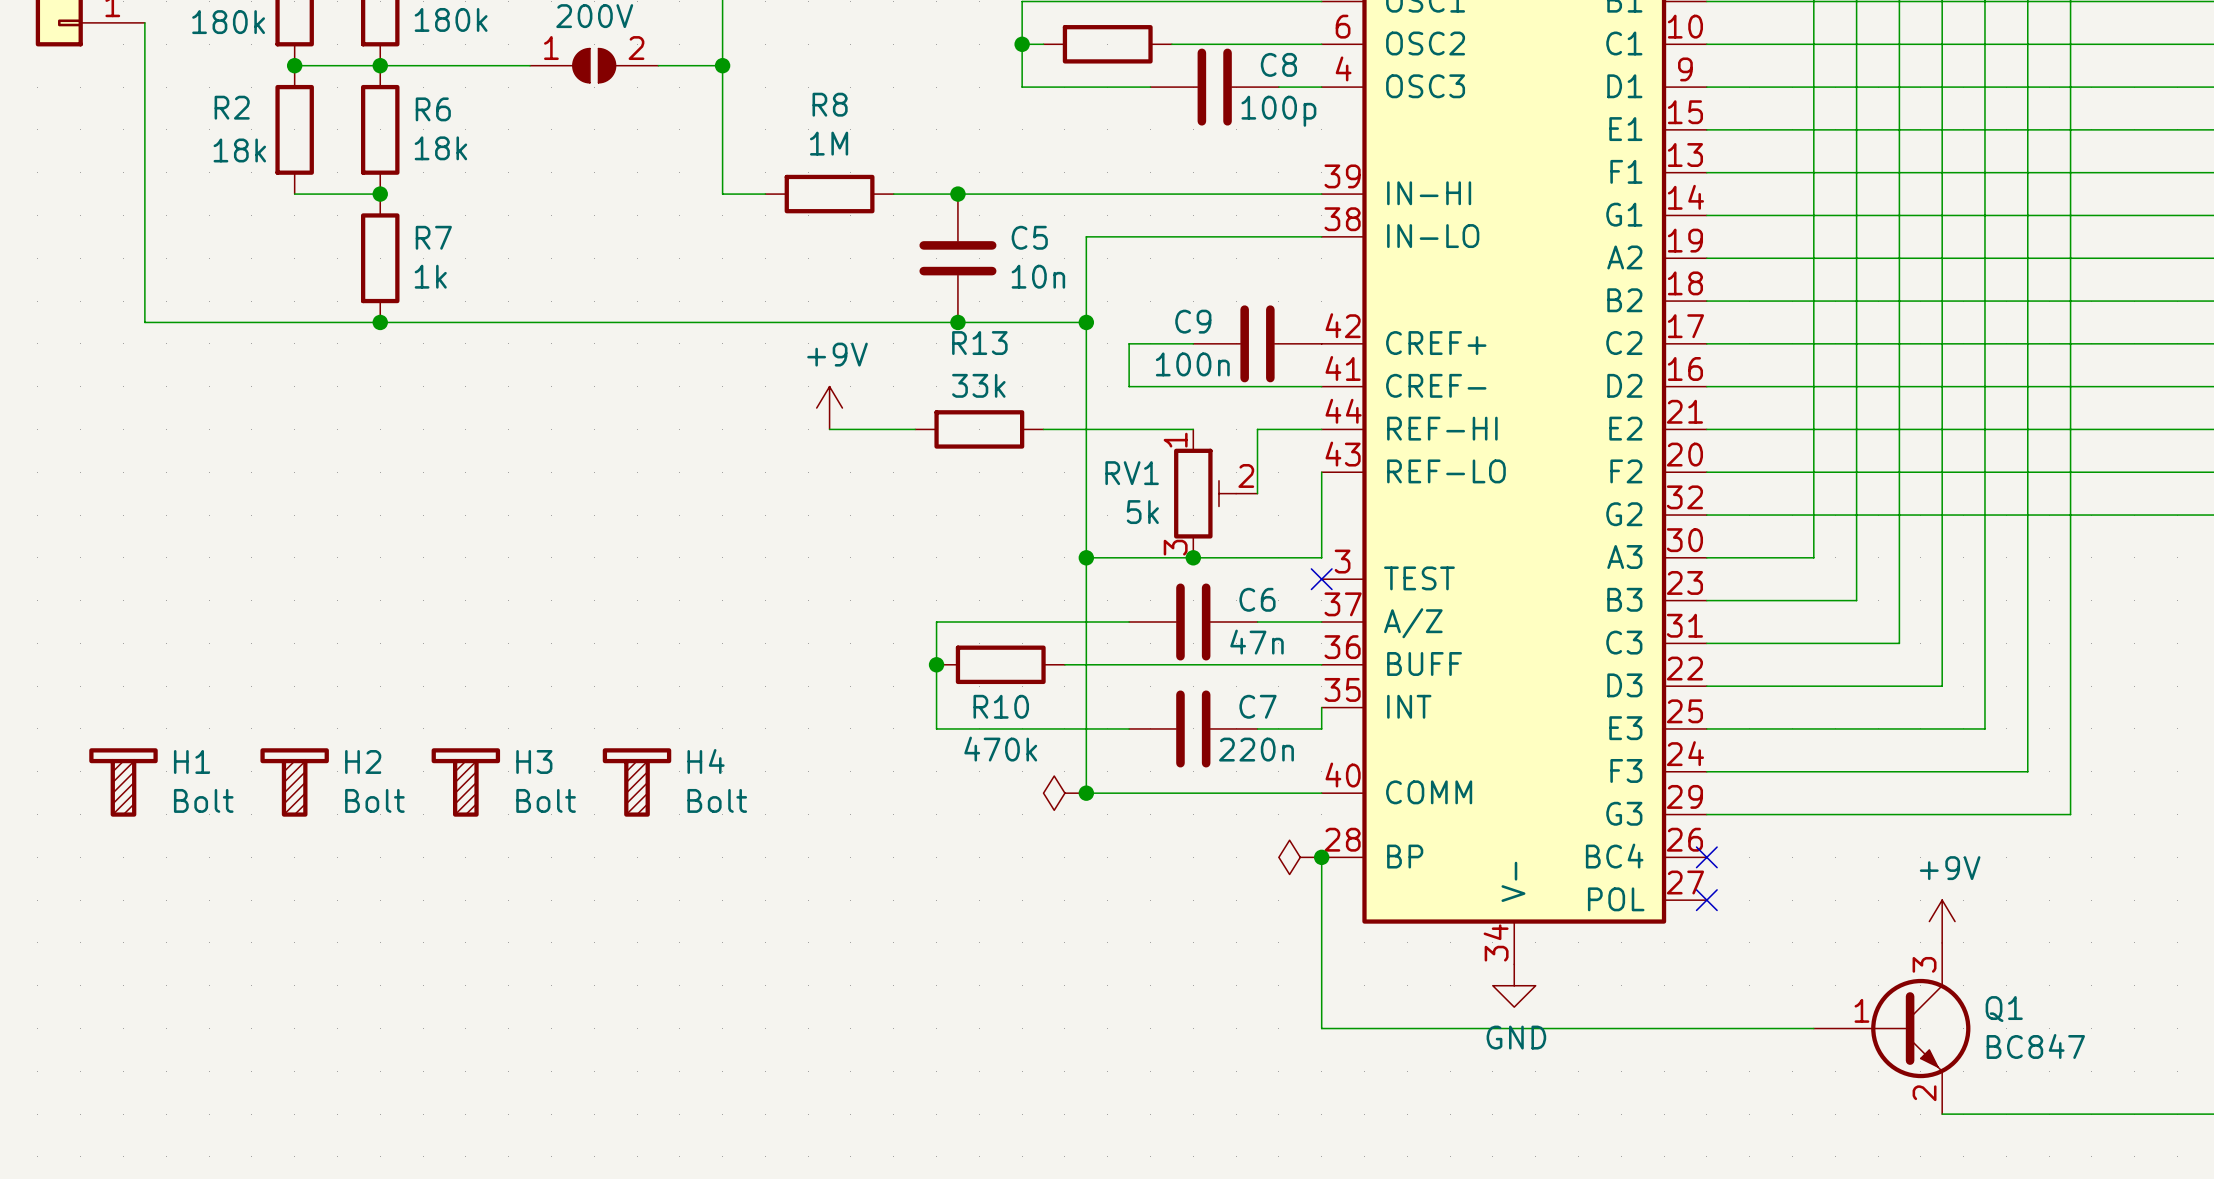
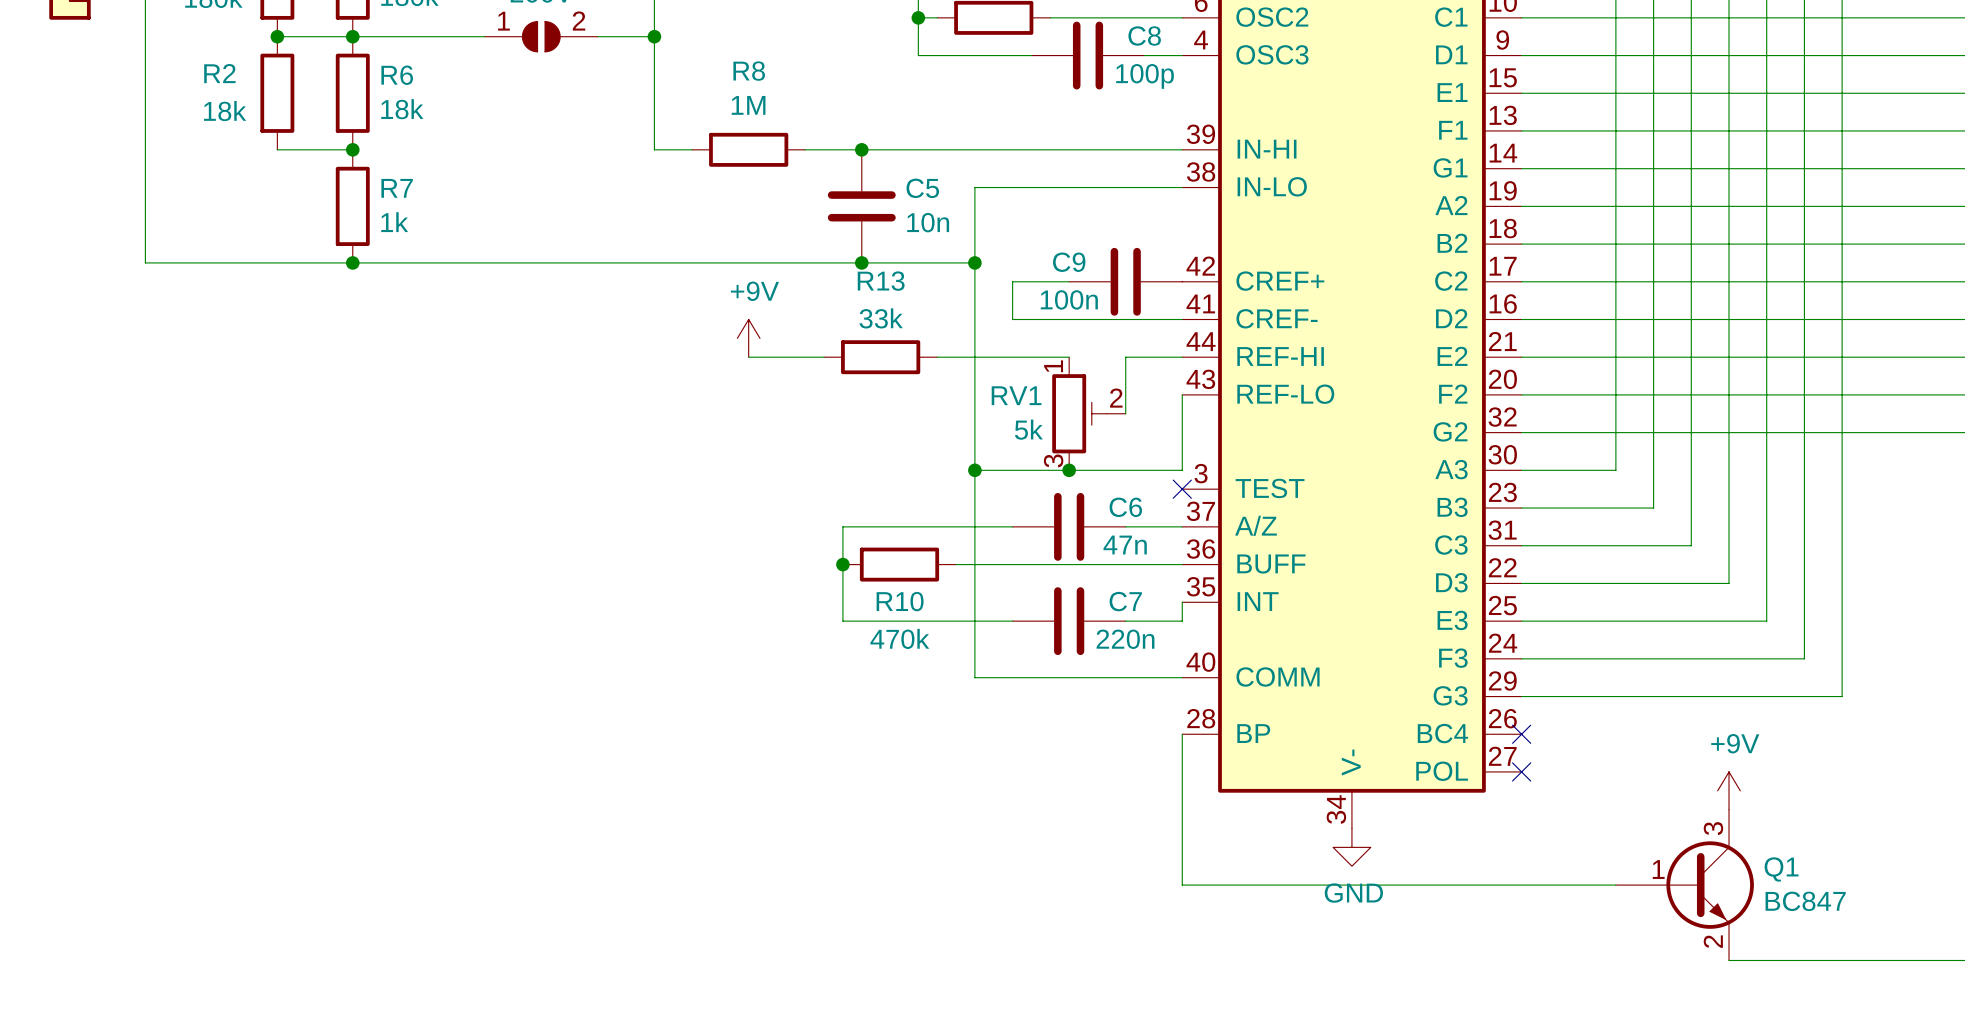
H1: Bolt (123, 782) -> none
H2: Bolt (294, 782) -> none
H3: Bolt (465, 782) -> none
H4: Bolt (637, 782) -> none
power symbol: (1064, 793) -> none
junction: (1086, 793) -> none
power symbol: (1300, 857) -> none
junction: (1321, 857) -> none

